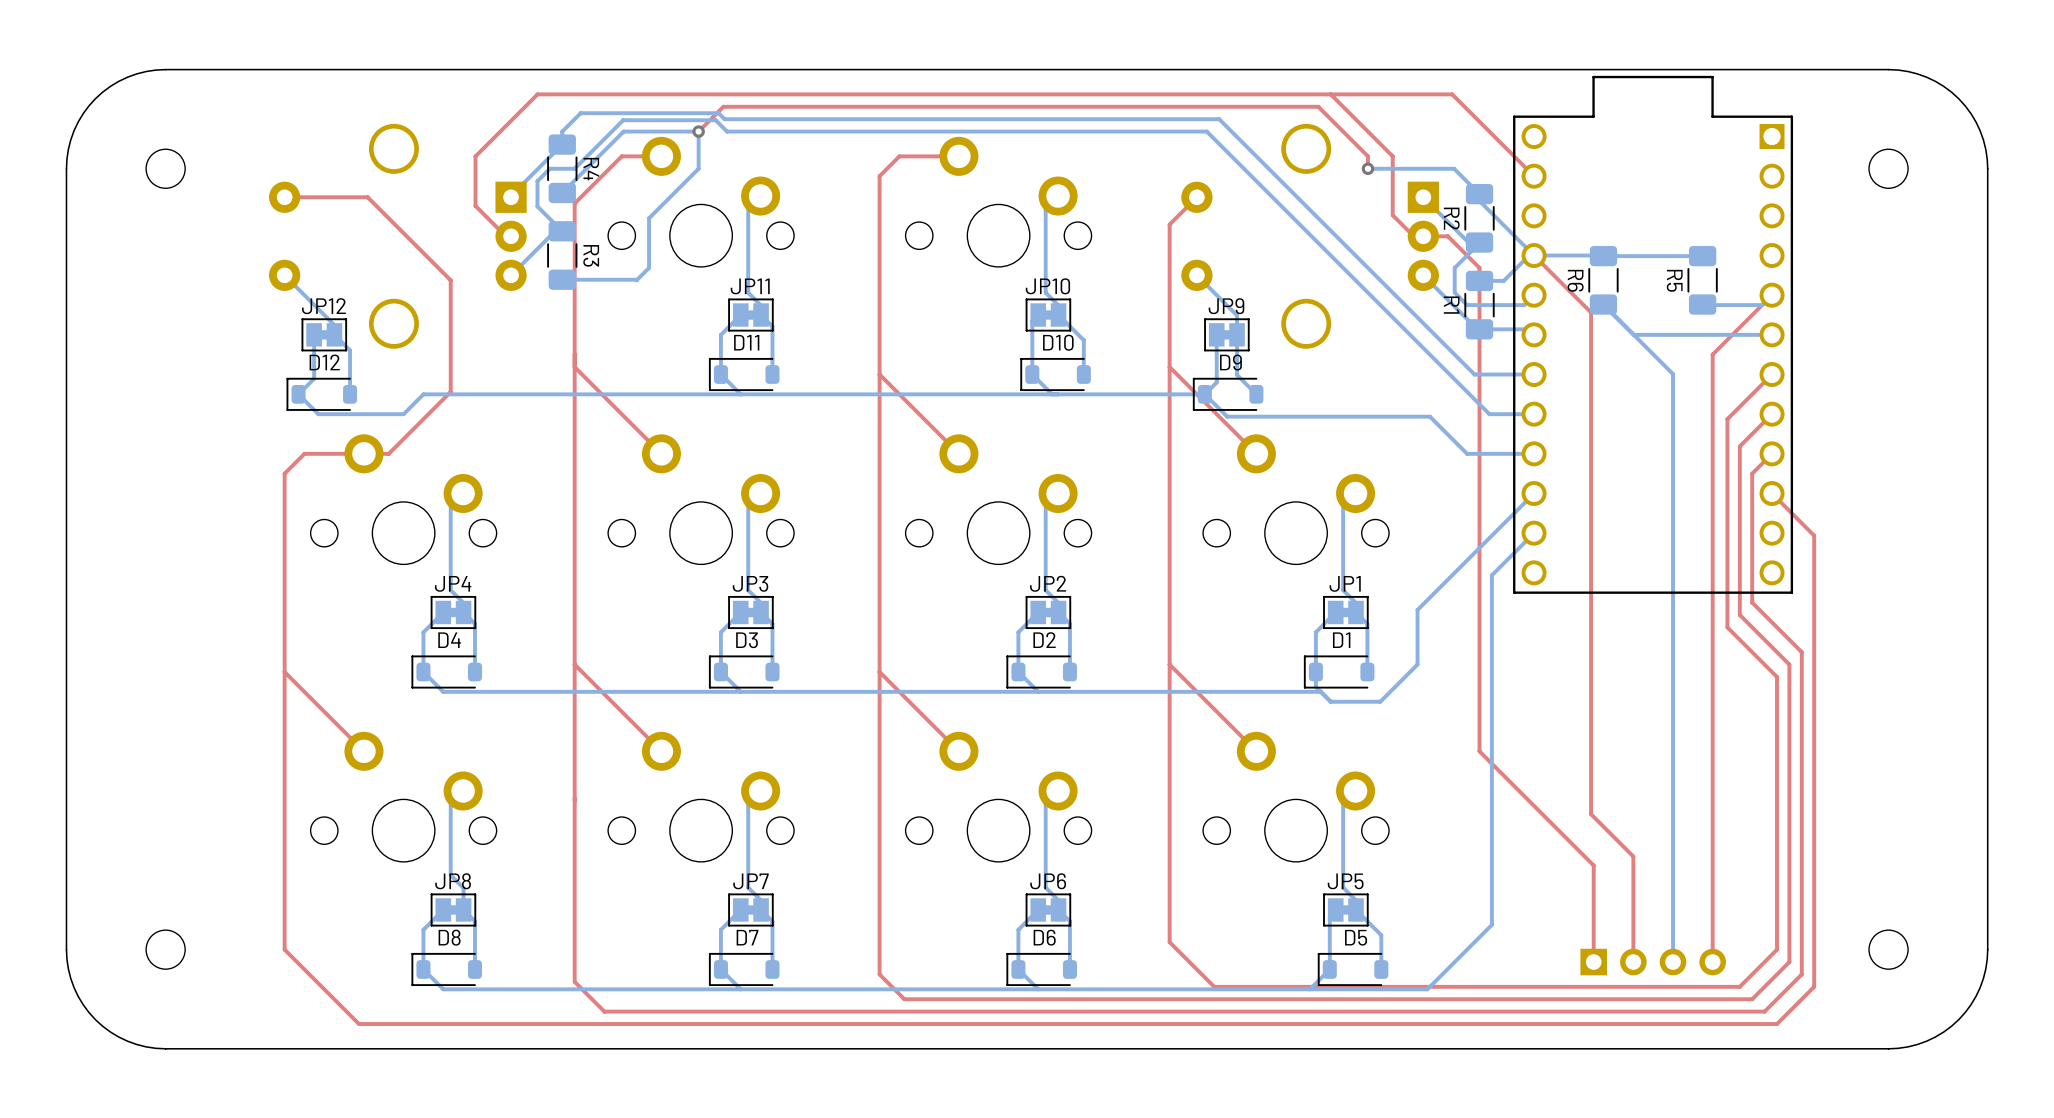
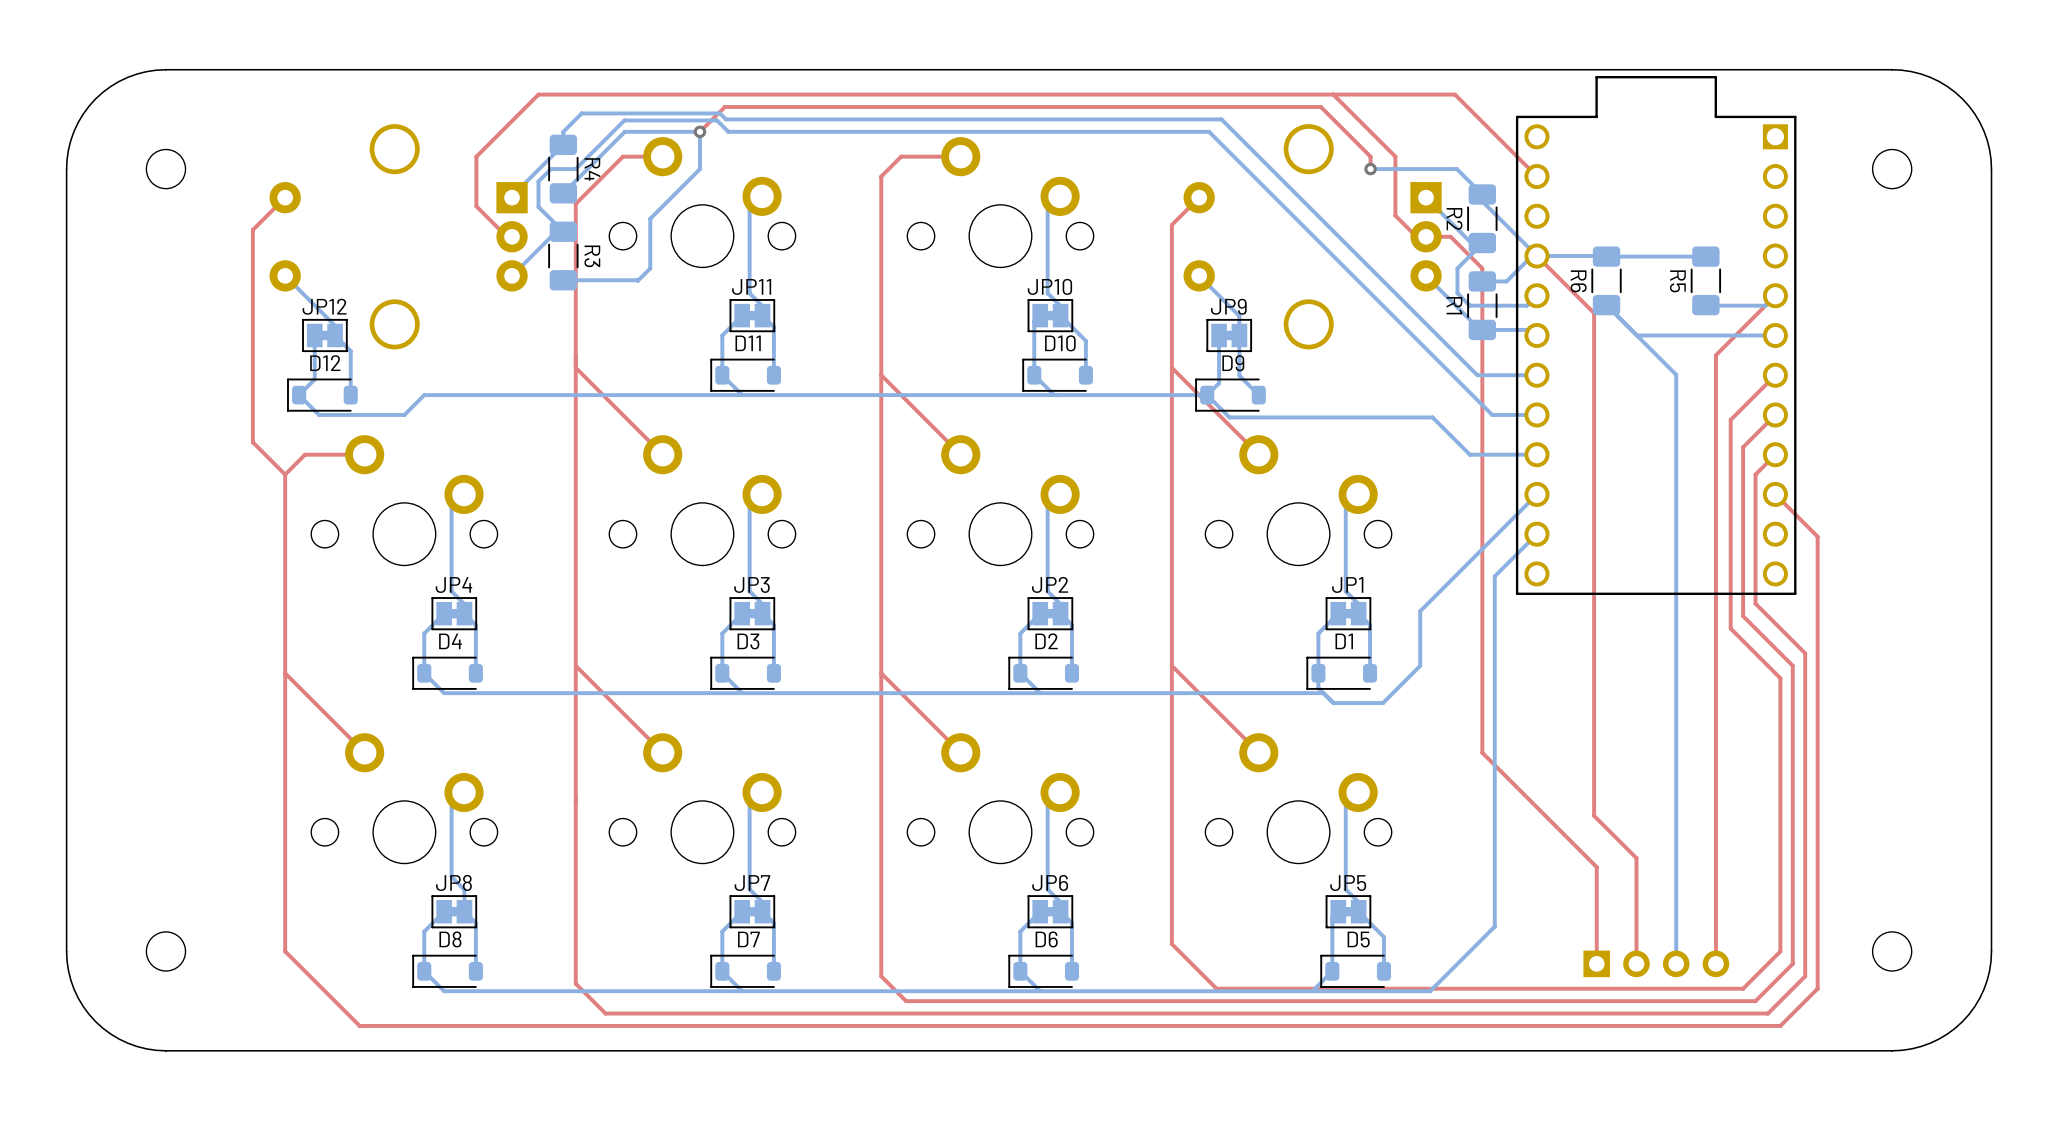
top track: (284, 197) (367, 197) (450, 280) (450, 391) (388, 453) (363, 453) -> (285, 197) (252, 229) (252, 442) (285, 474)

